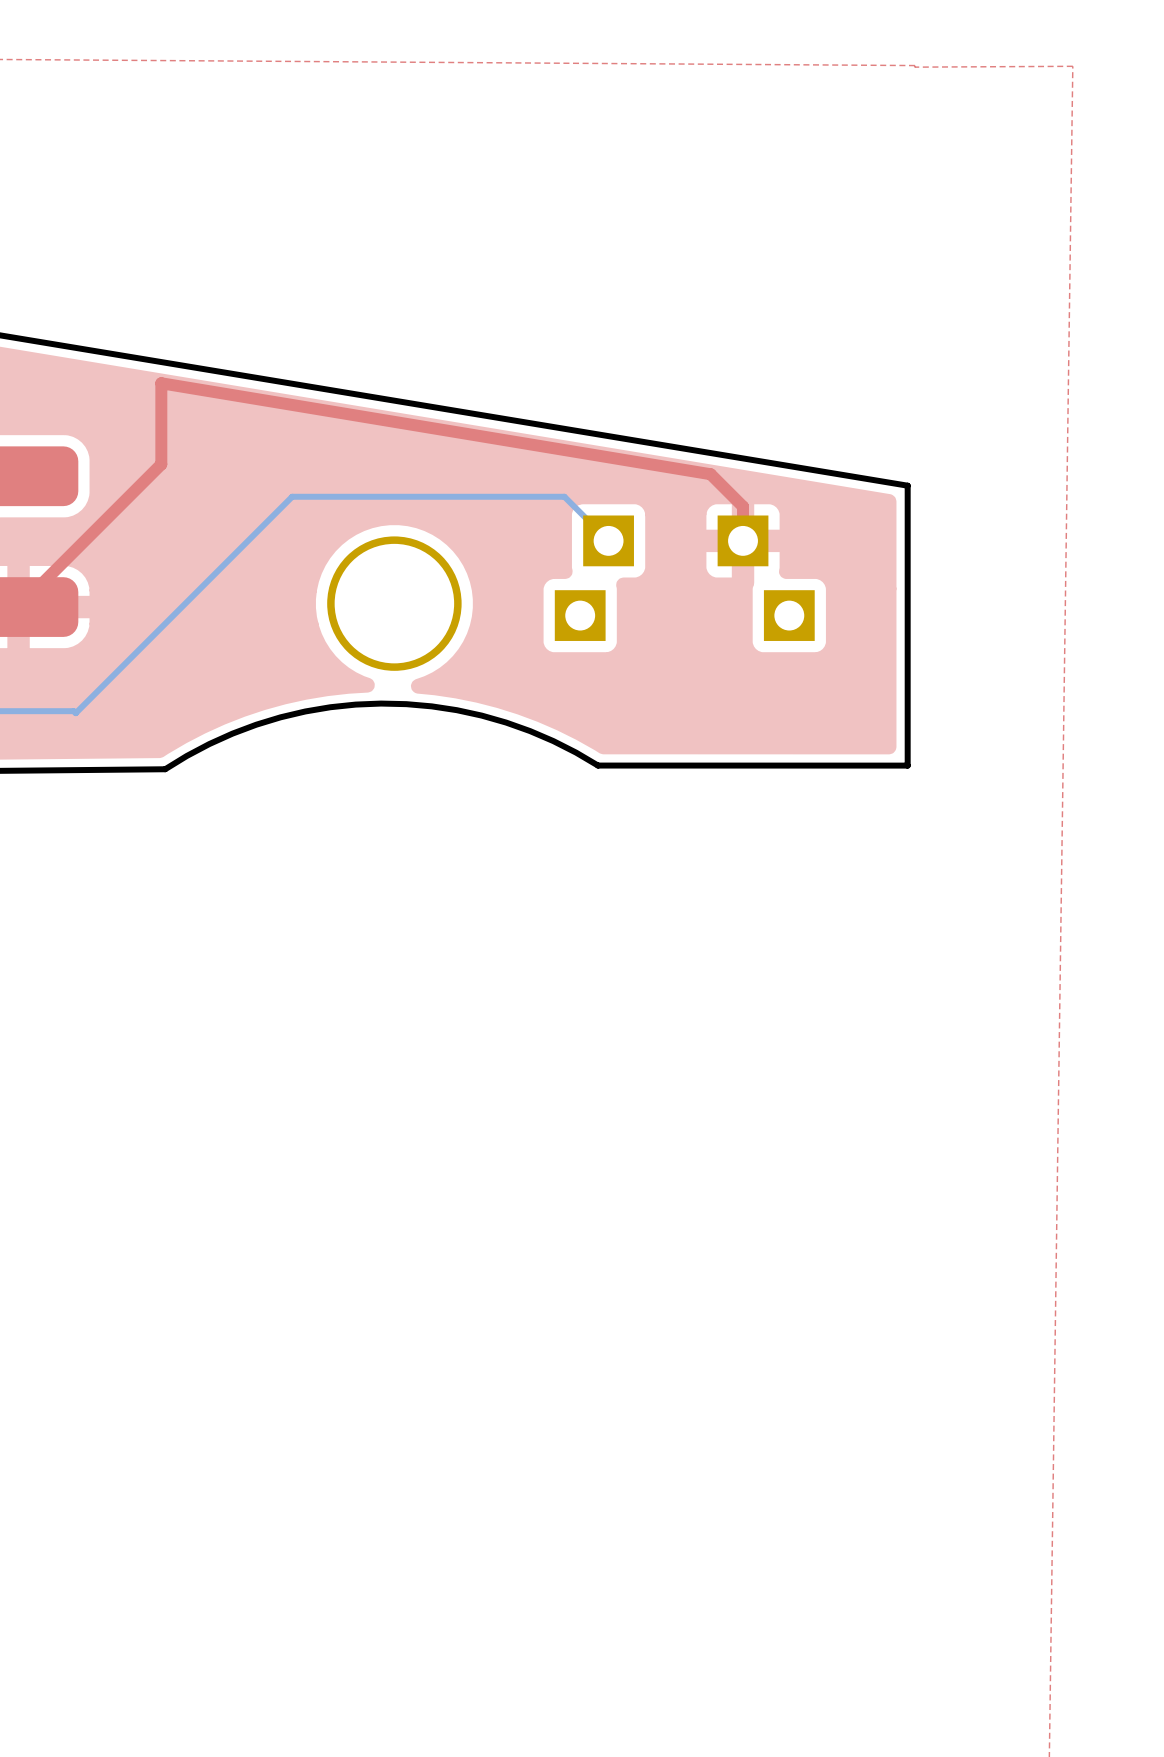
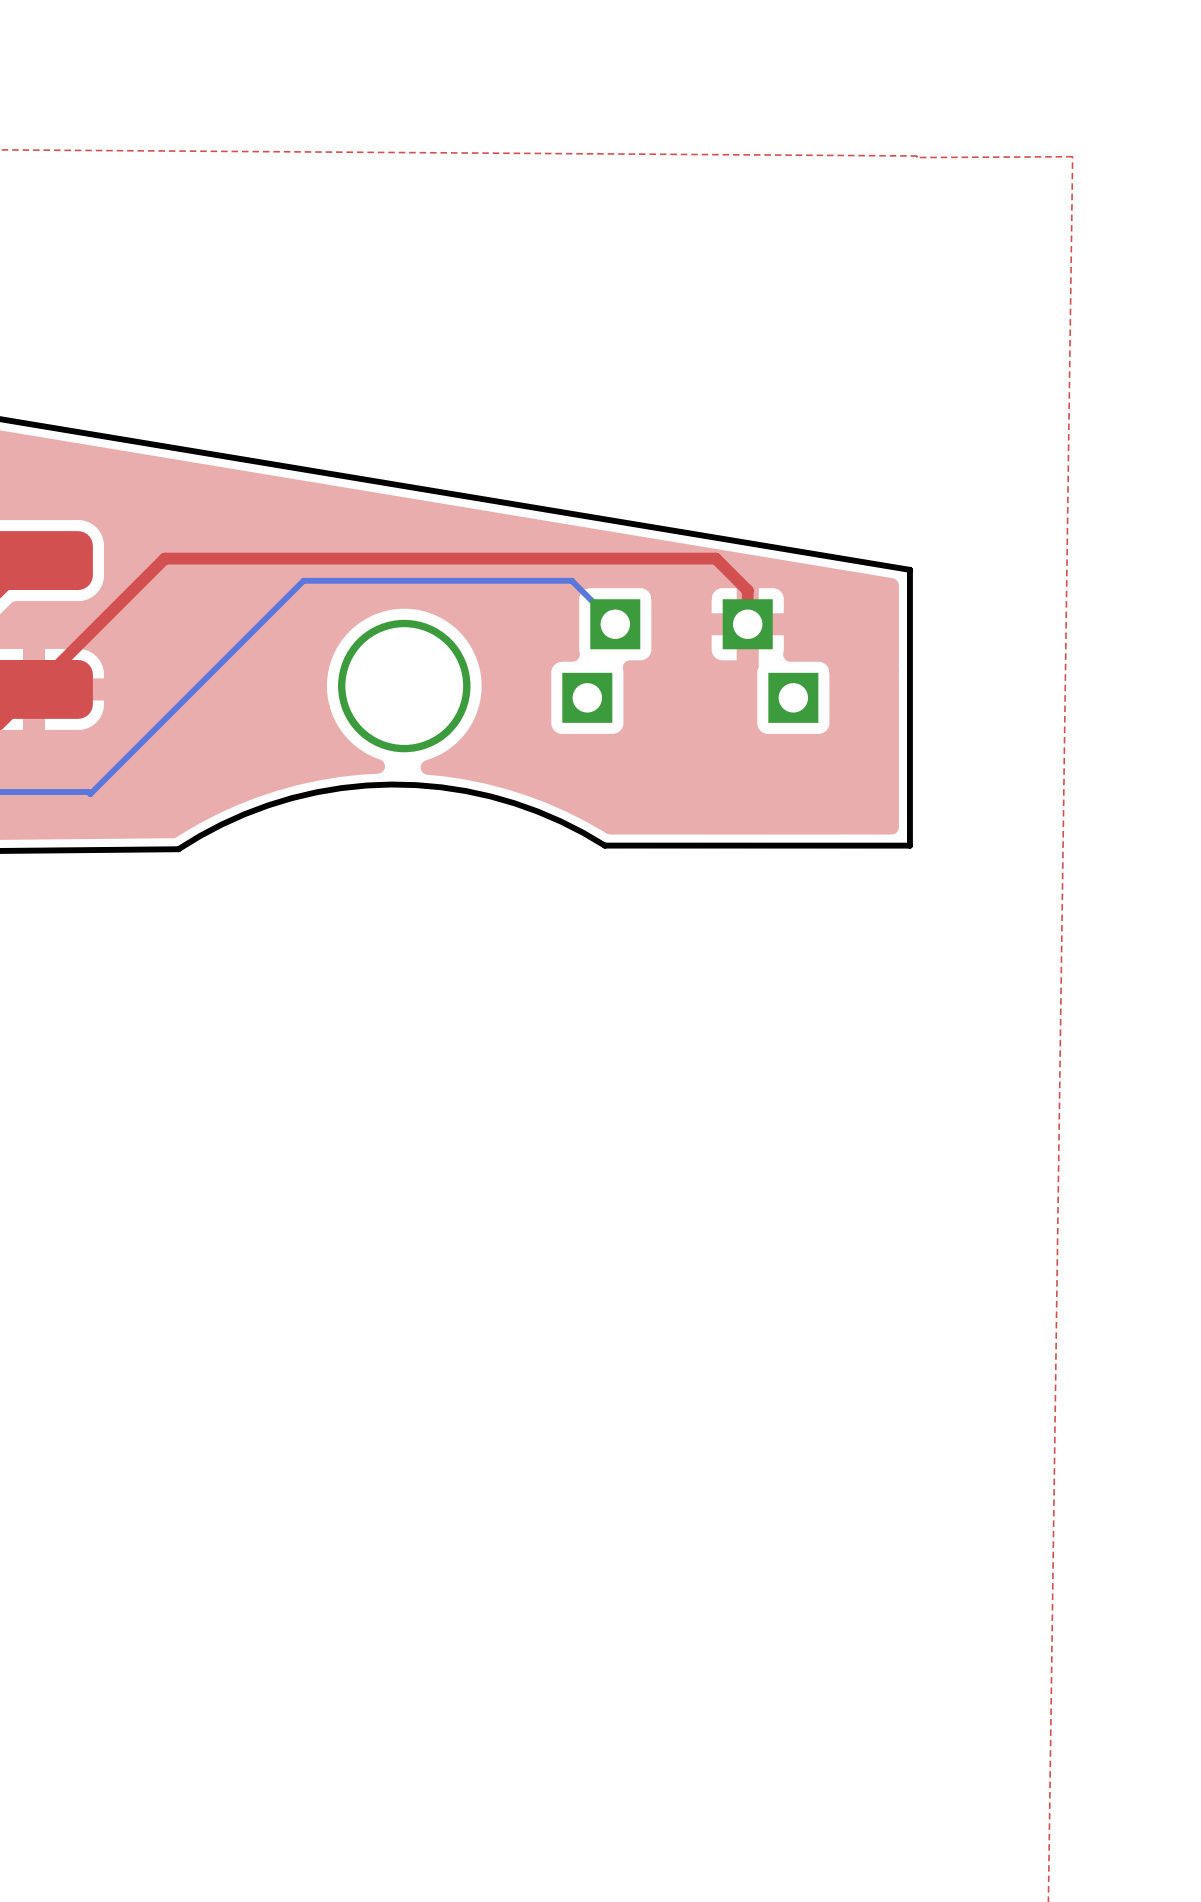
top track: (710, 474) (161, 383) (161, 464) (151, 474) -> (715, 558) (164, 558)

